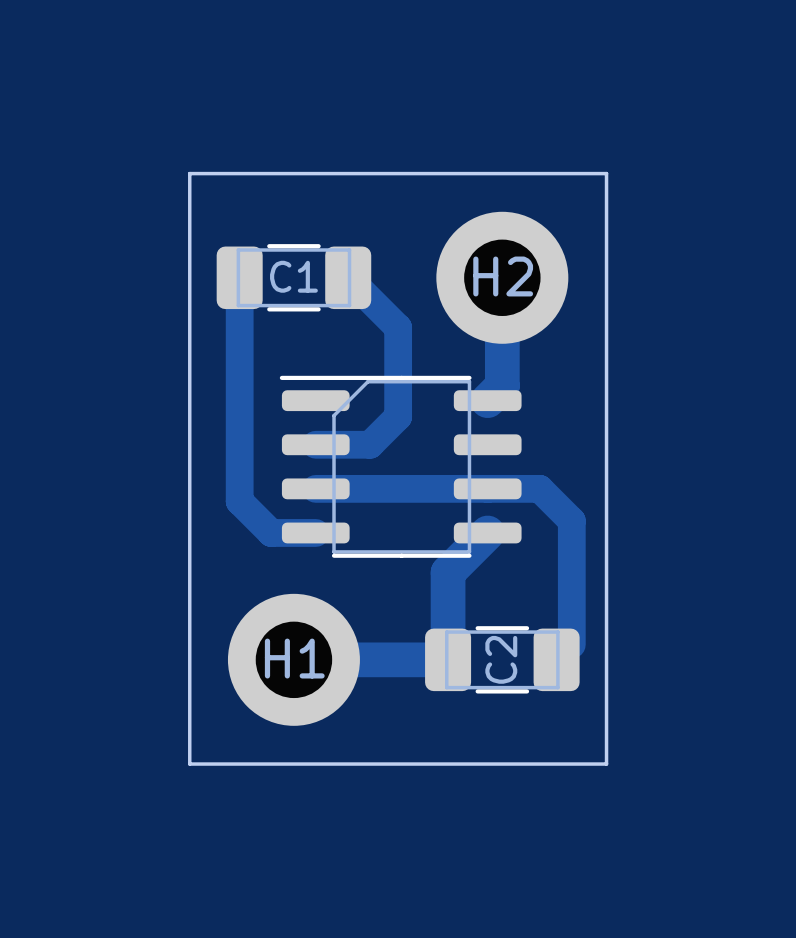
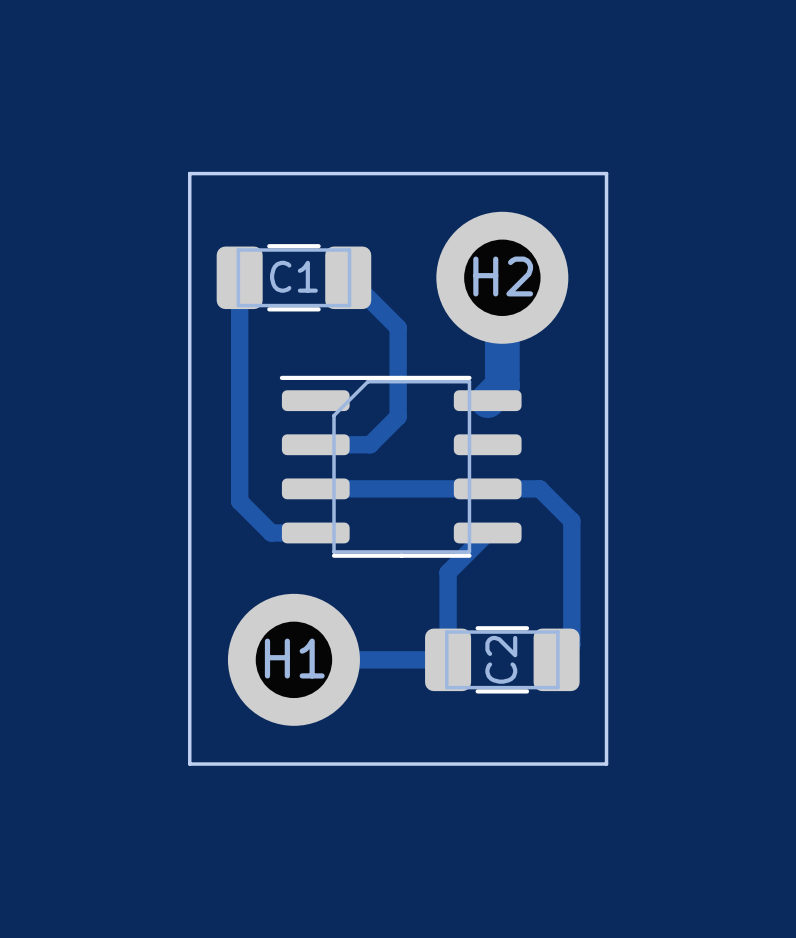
track width: thick (239, 277) (239, 501) (271, 532) (315, 532) -> thin (239, 277) (239, 501) (271, 532) (315, 532)
track width: thick (348, 277) (398, 327) (398, 416) (370, 444) (315, 444) -> thin (348, 277) (398, 327) (398, 416) (370, 444) (315, 444)
track width: thick (315, 488) (539, 488) (571, 520) (571, 644) -> thin (315, 488) (539, 488) (571, 520) (571, 644)
track width: thick (487, 532) (448, 572) (448, 659) (293, 659) -> thin (487, 532) (448, 572) (448, 659) (293, 659)

